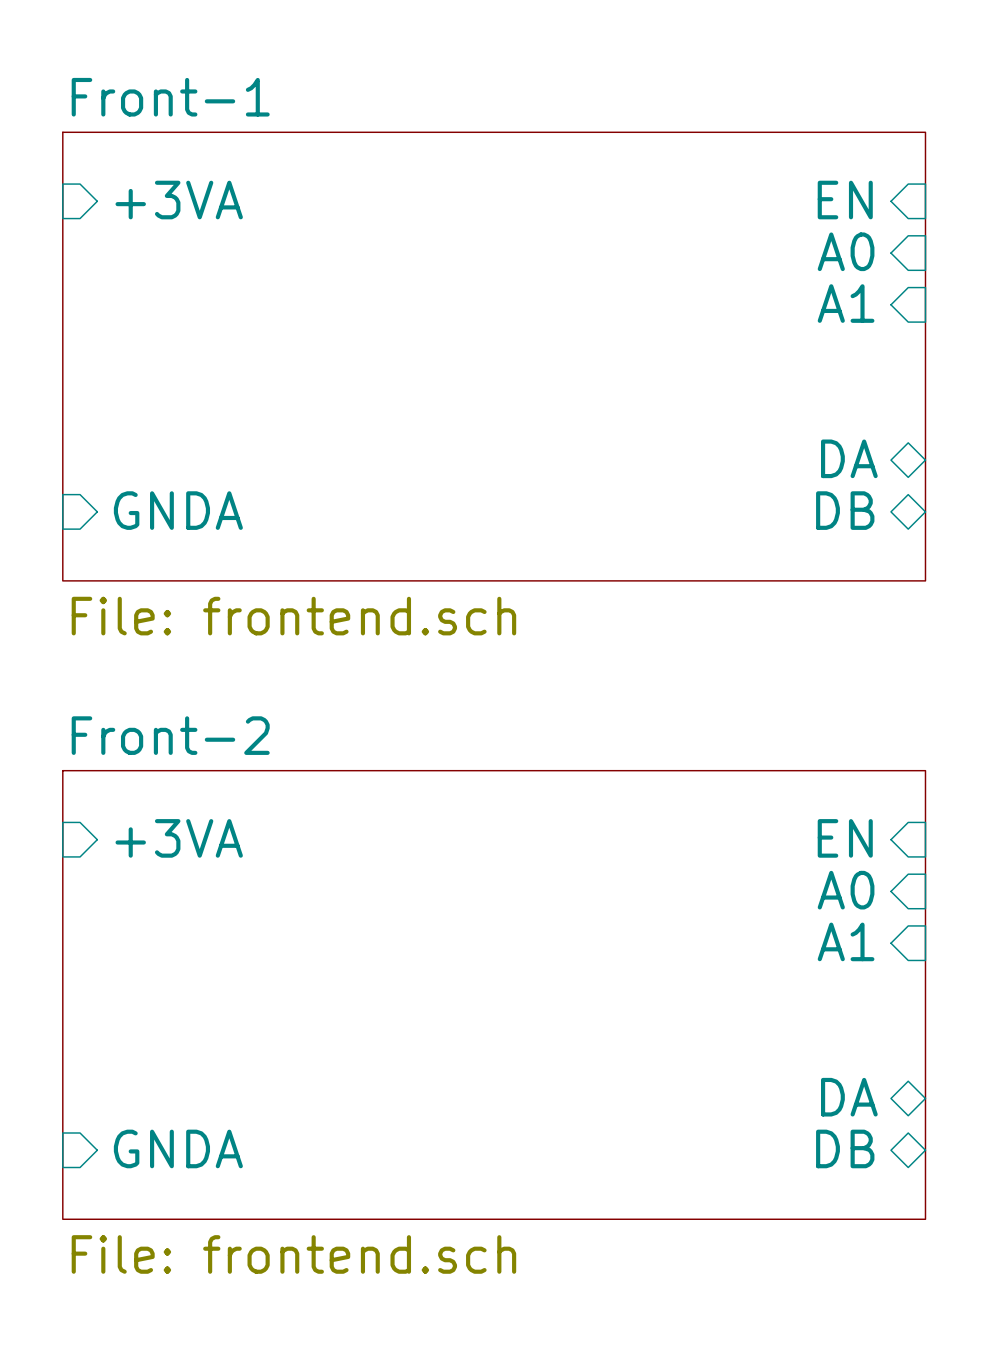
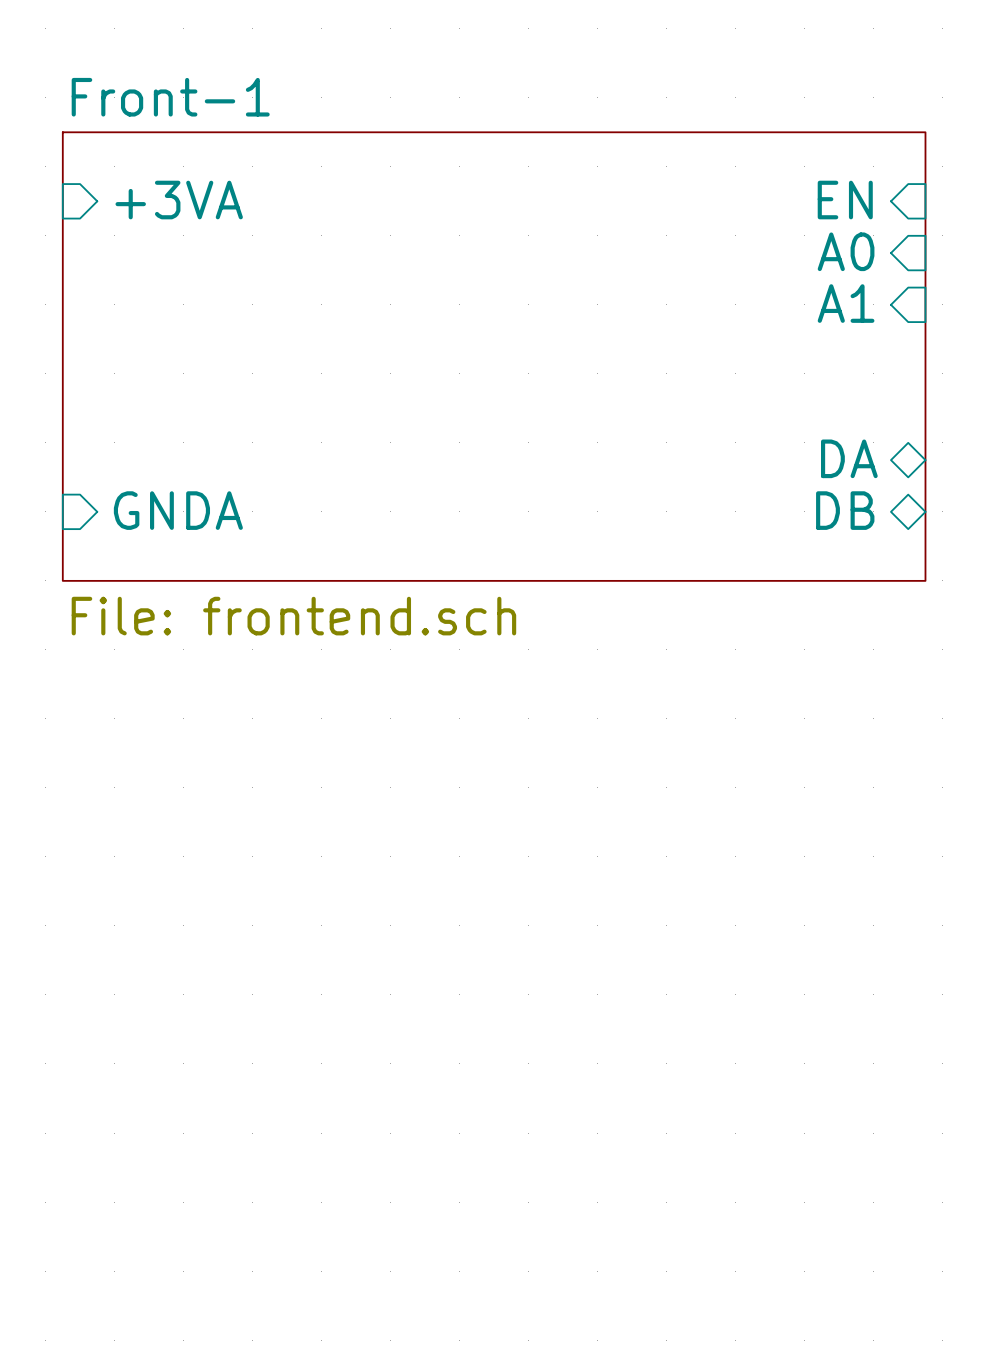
sheet pin: +3VA (179, 838) -> none
sheet pin: EN (845, 838) -> none
sheet pin: A0 (846, 890) -> none
sheet pin: A1 (846, 941) -> none
sheet Front-2: File: frontend.sch (494, 994) -> none
sheet pin: DA (849, 1097) -> none
sheet pin: GNDA (178, 1148) -> none
sheet pin: DB (845, 1148) -> none

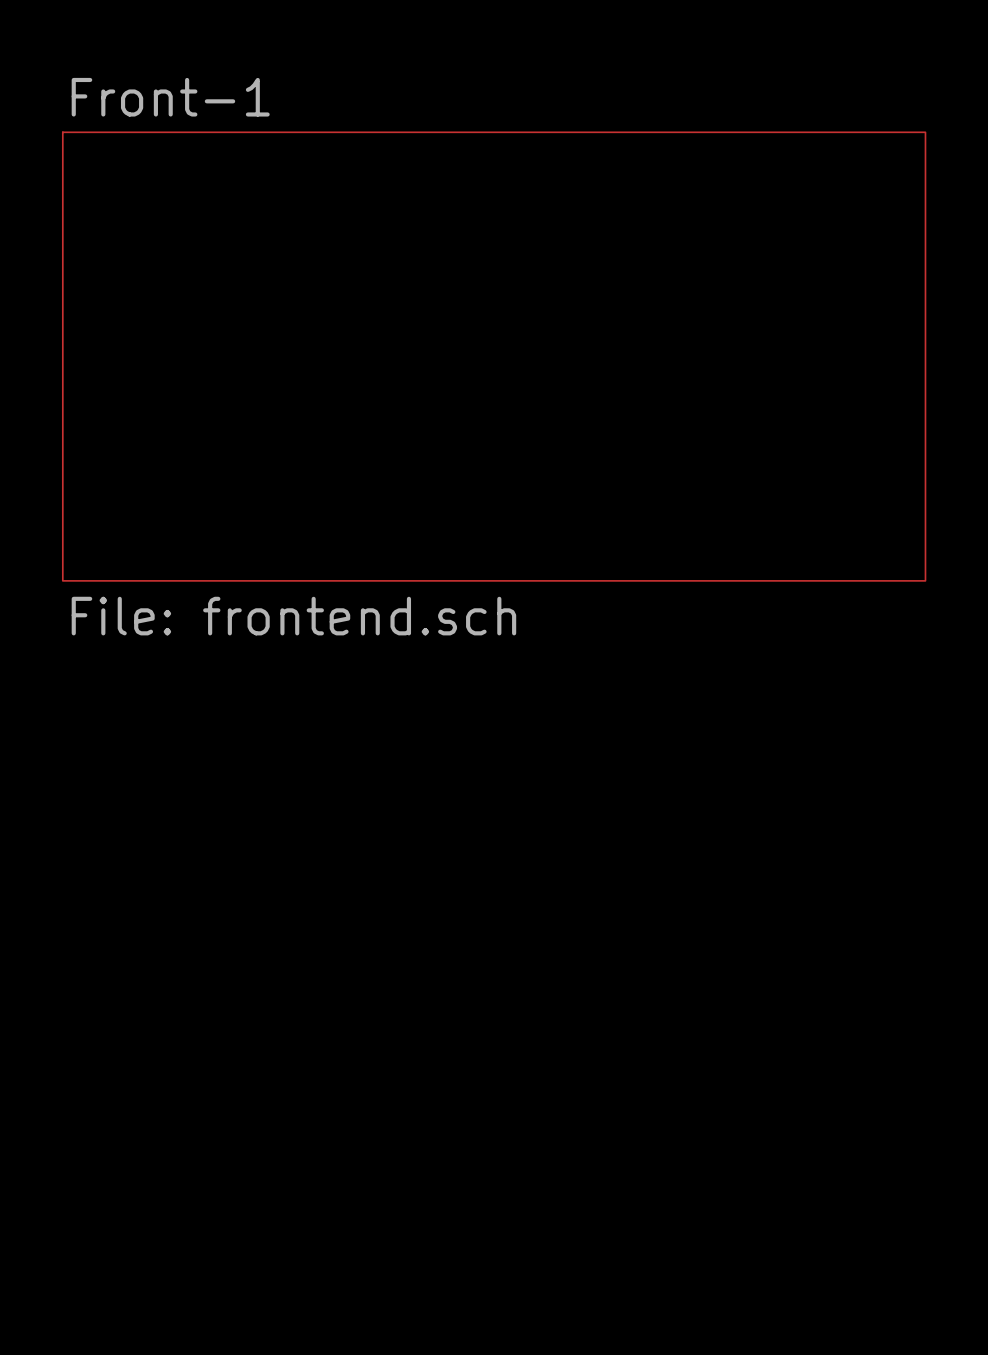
sheet pin: +3VA (179, 200) -> none
sheet pin: EN (845, 200) -> none
sheet pin: A0 (846, 251) -> none
sheet pin: A1 (846, 303) -> none
sheet pin: DA (849, 458) -> none
sheet pin: GNDA (178, 510) -> none
sheet pin: DB (845, 510) -> none

